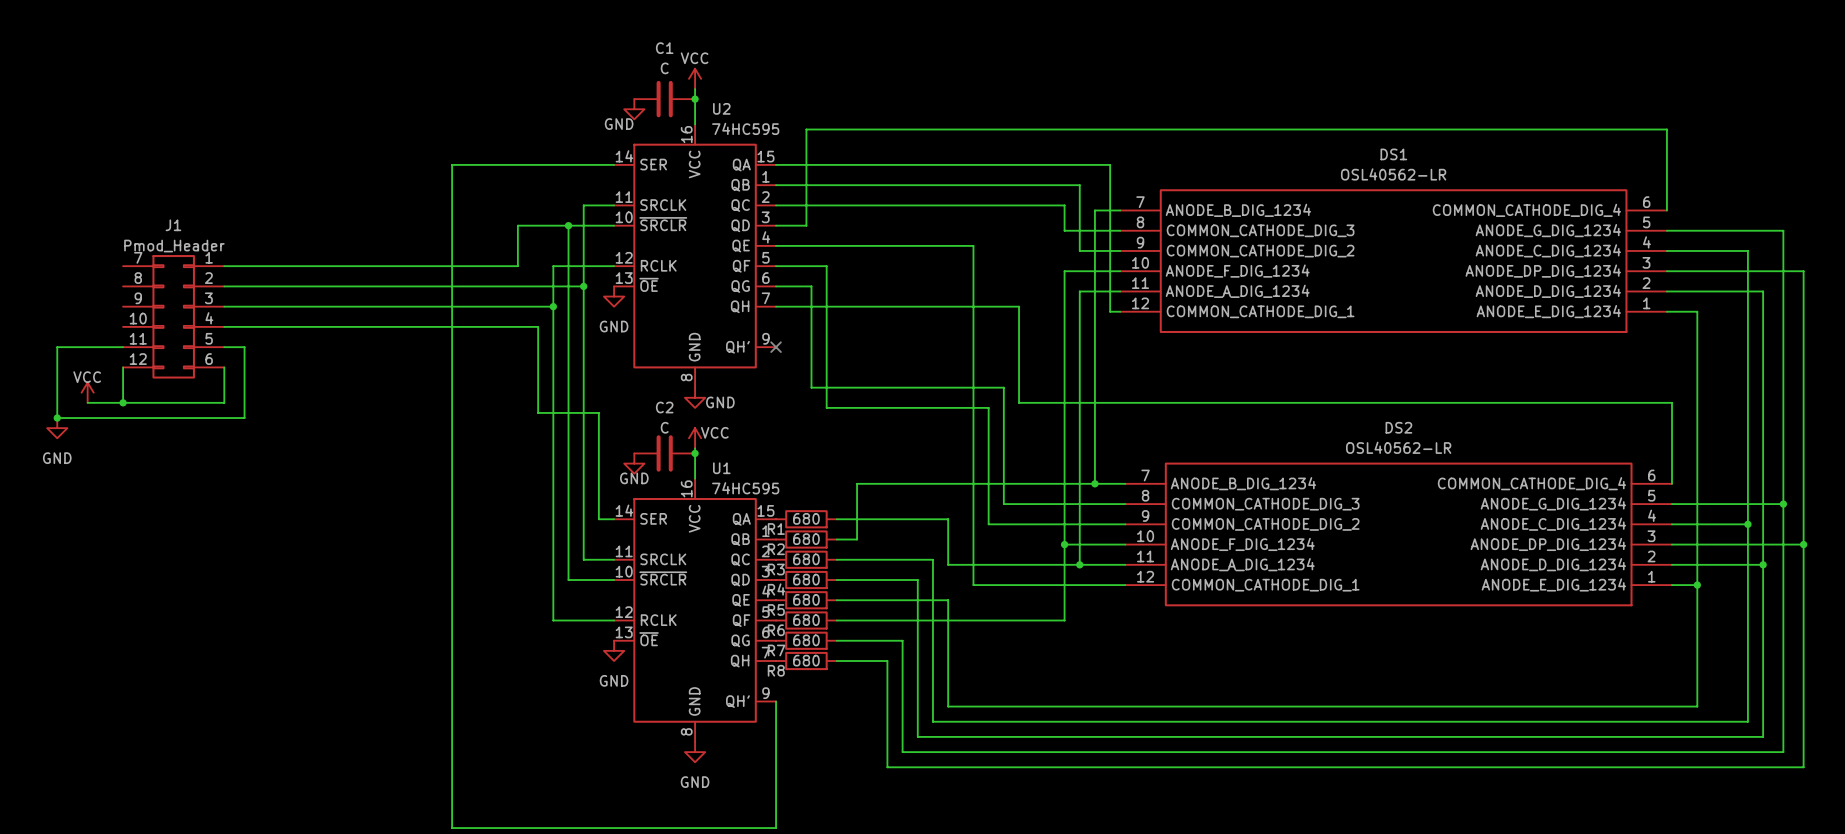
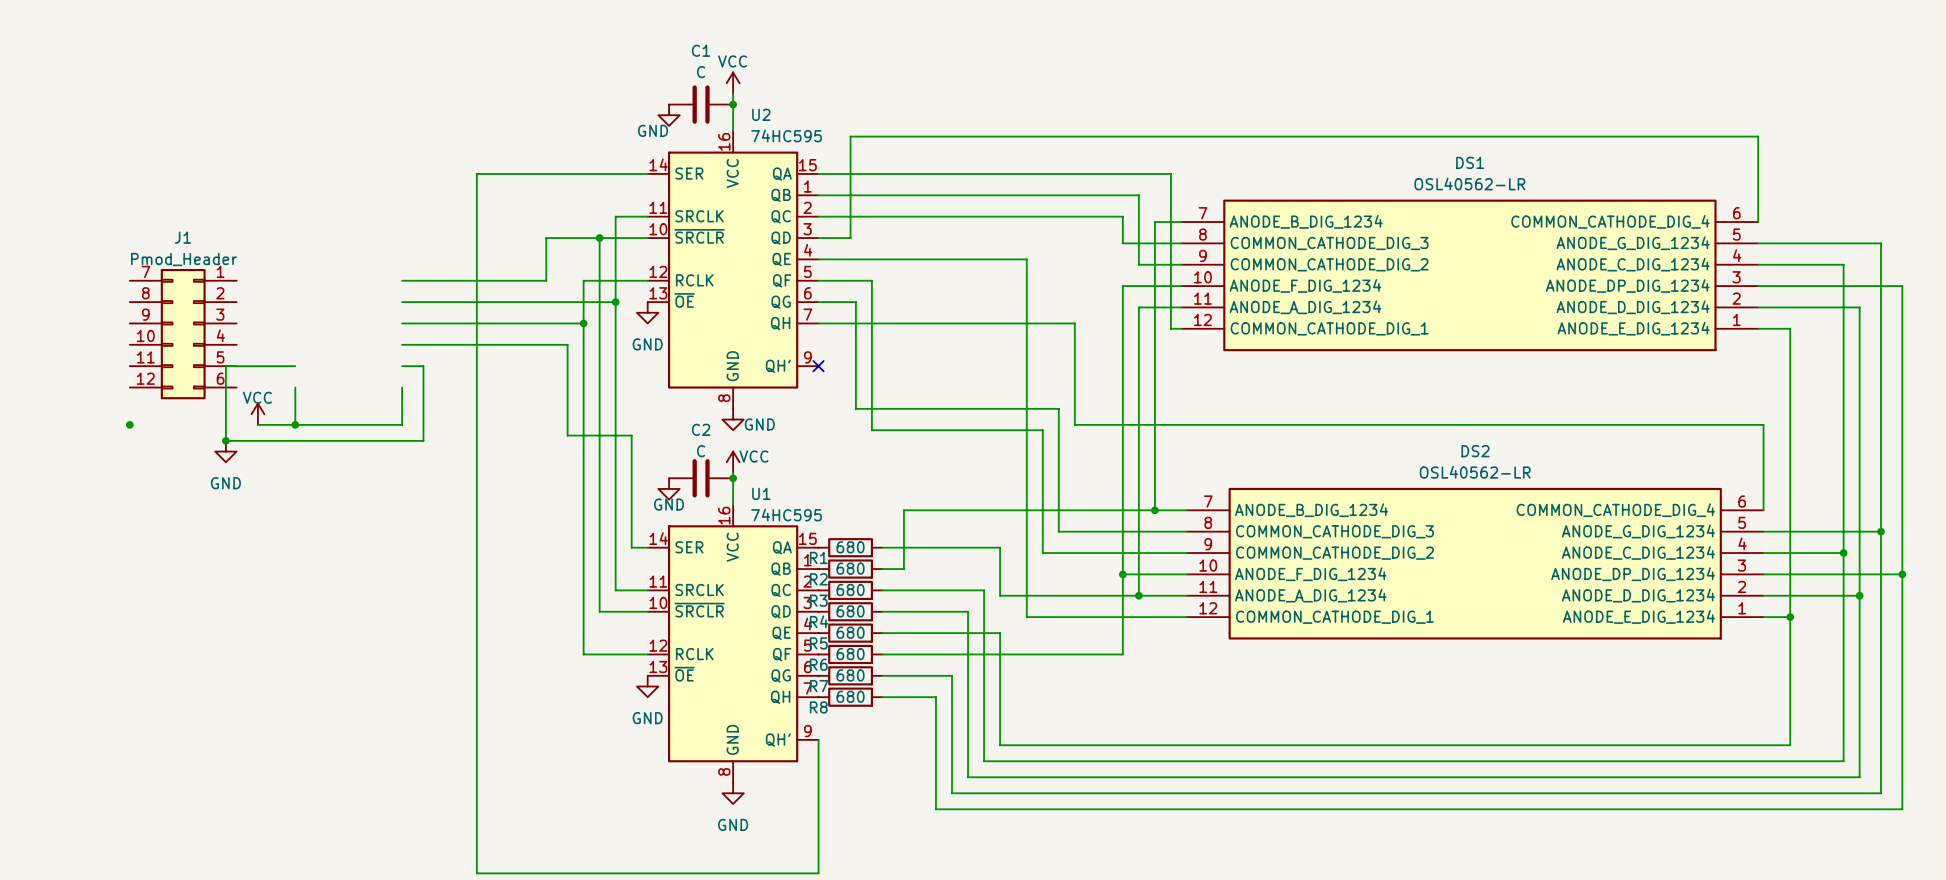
wire: (224, 266) (381, 266) -> none
wire: (224, 286) (381, 286) -> none
wire: (224, 306) (381, 306) -> none
wire: (224, 326) (381, 326) -> none
wire: (123, 347) (57, 347) (57, 418) (214, 418) -> (236, 366) (225, 366) (225, 440)
wire: (244, 347) (244, 418) -> (257, 366) (295, 366)
wire: none -> (402, 366) (423, 366) (423, 440) (257, 440)
wire: (123, 367) (123, 402) -> (295, 387) (295, 424)
wire: (224, 367) (224, 402) (87, 402) -> (402, 387) (402, 424) (257, 424)
power symbol position: VCC (87, 392) -> VCC (257, 414)
junction: none -> (295, 424)
junction: (57, 418) -> none
junction: none -> (225, 440)
power symbol position: GND (57, 428) -> GND (225, 451)

